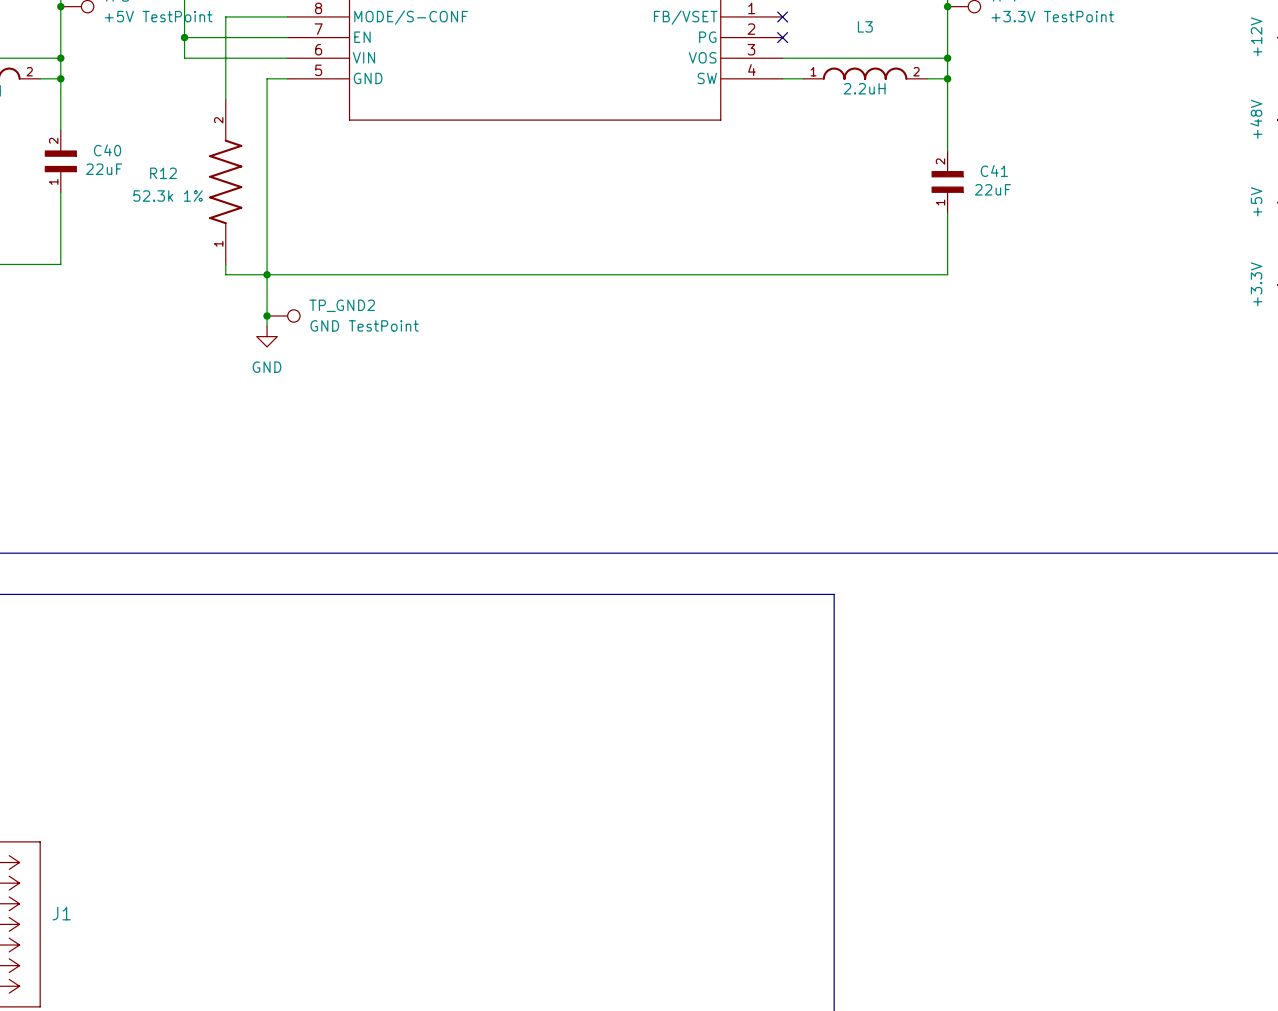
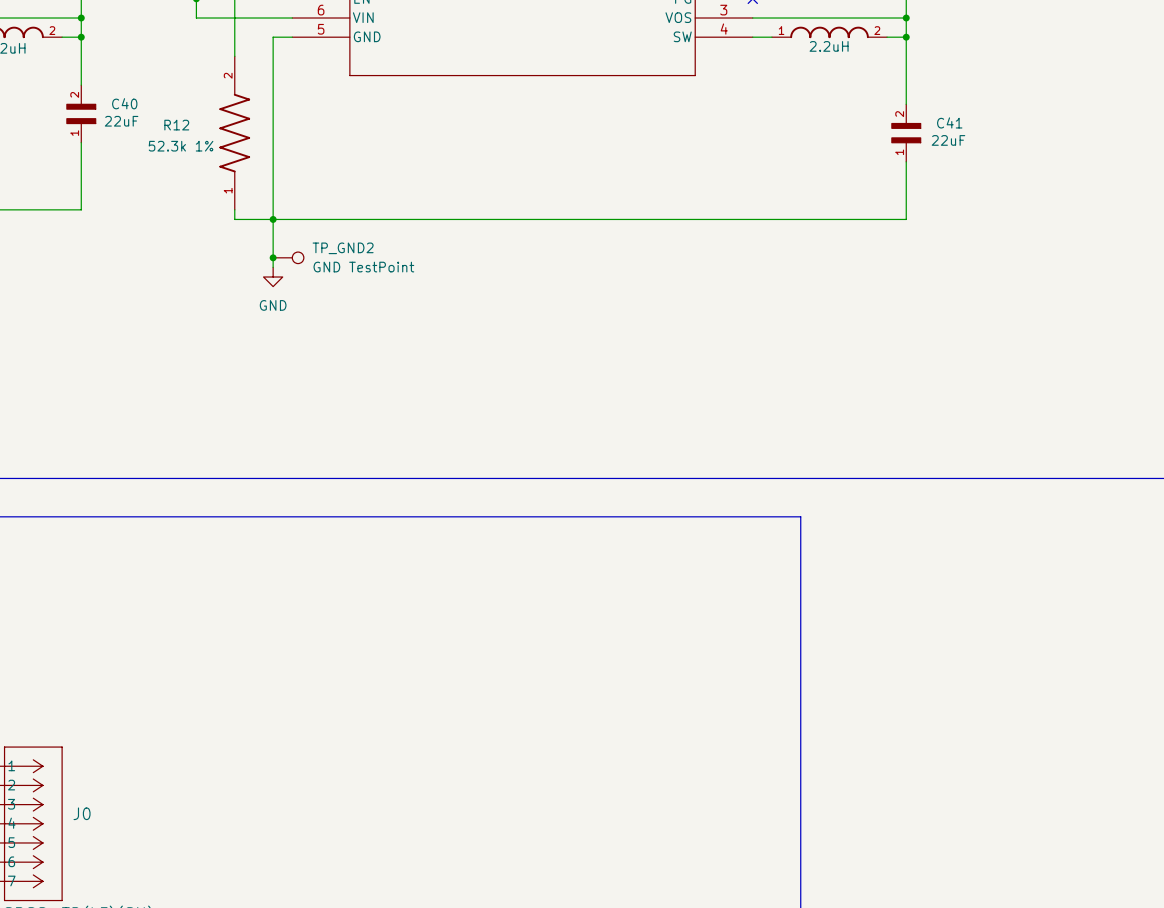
J1 name: J1 (61, 913) -> J0 (82, 813)

